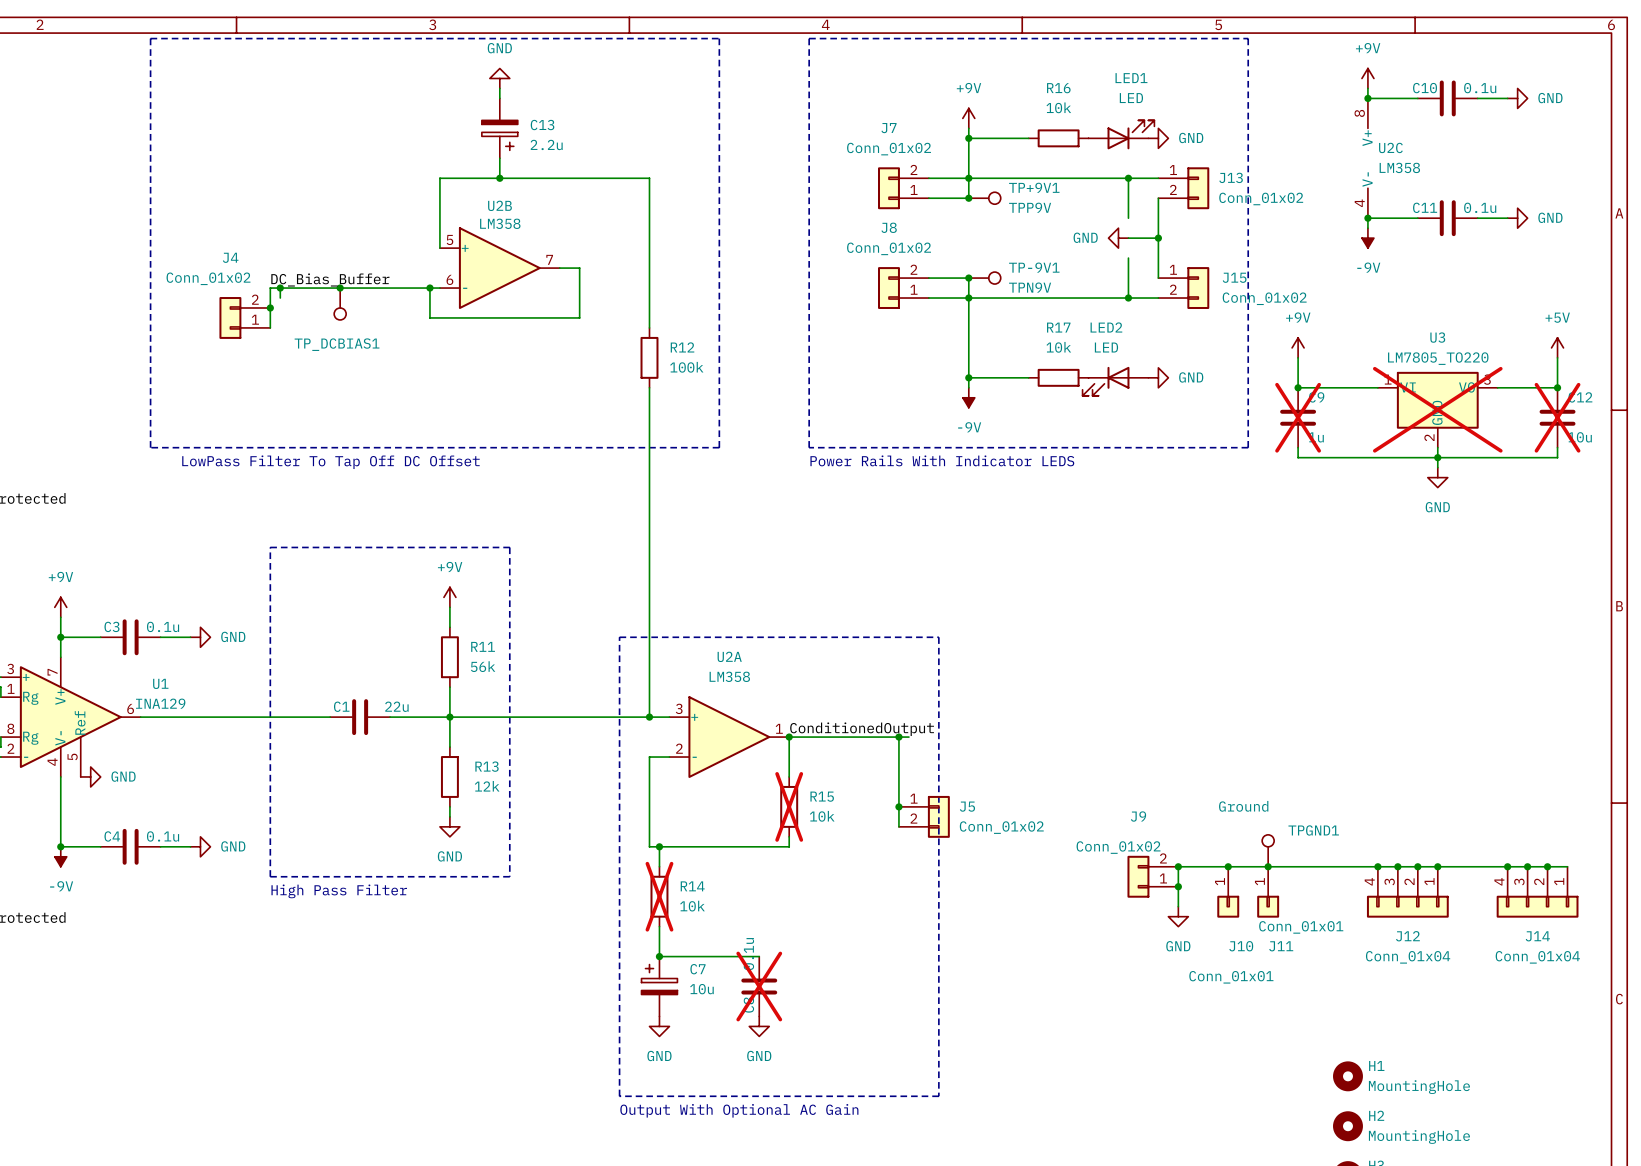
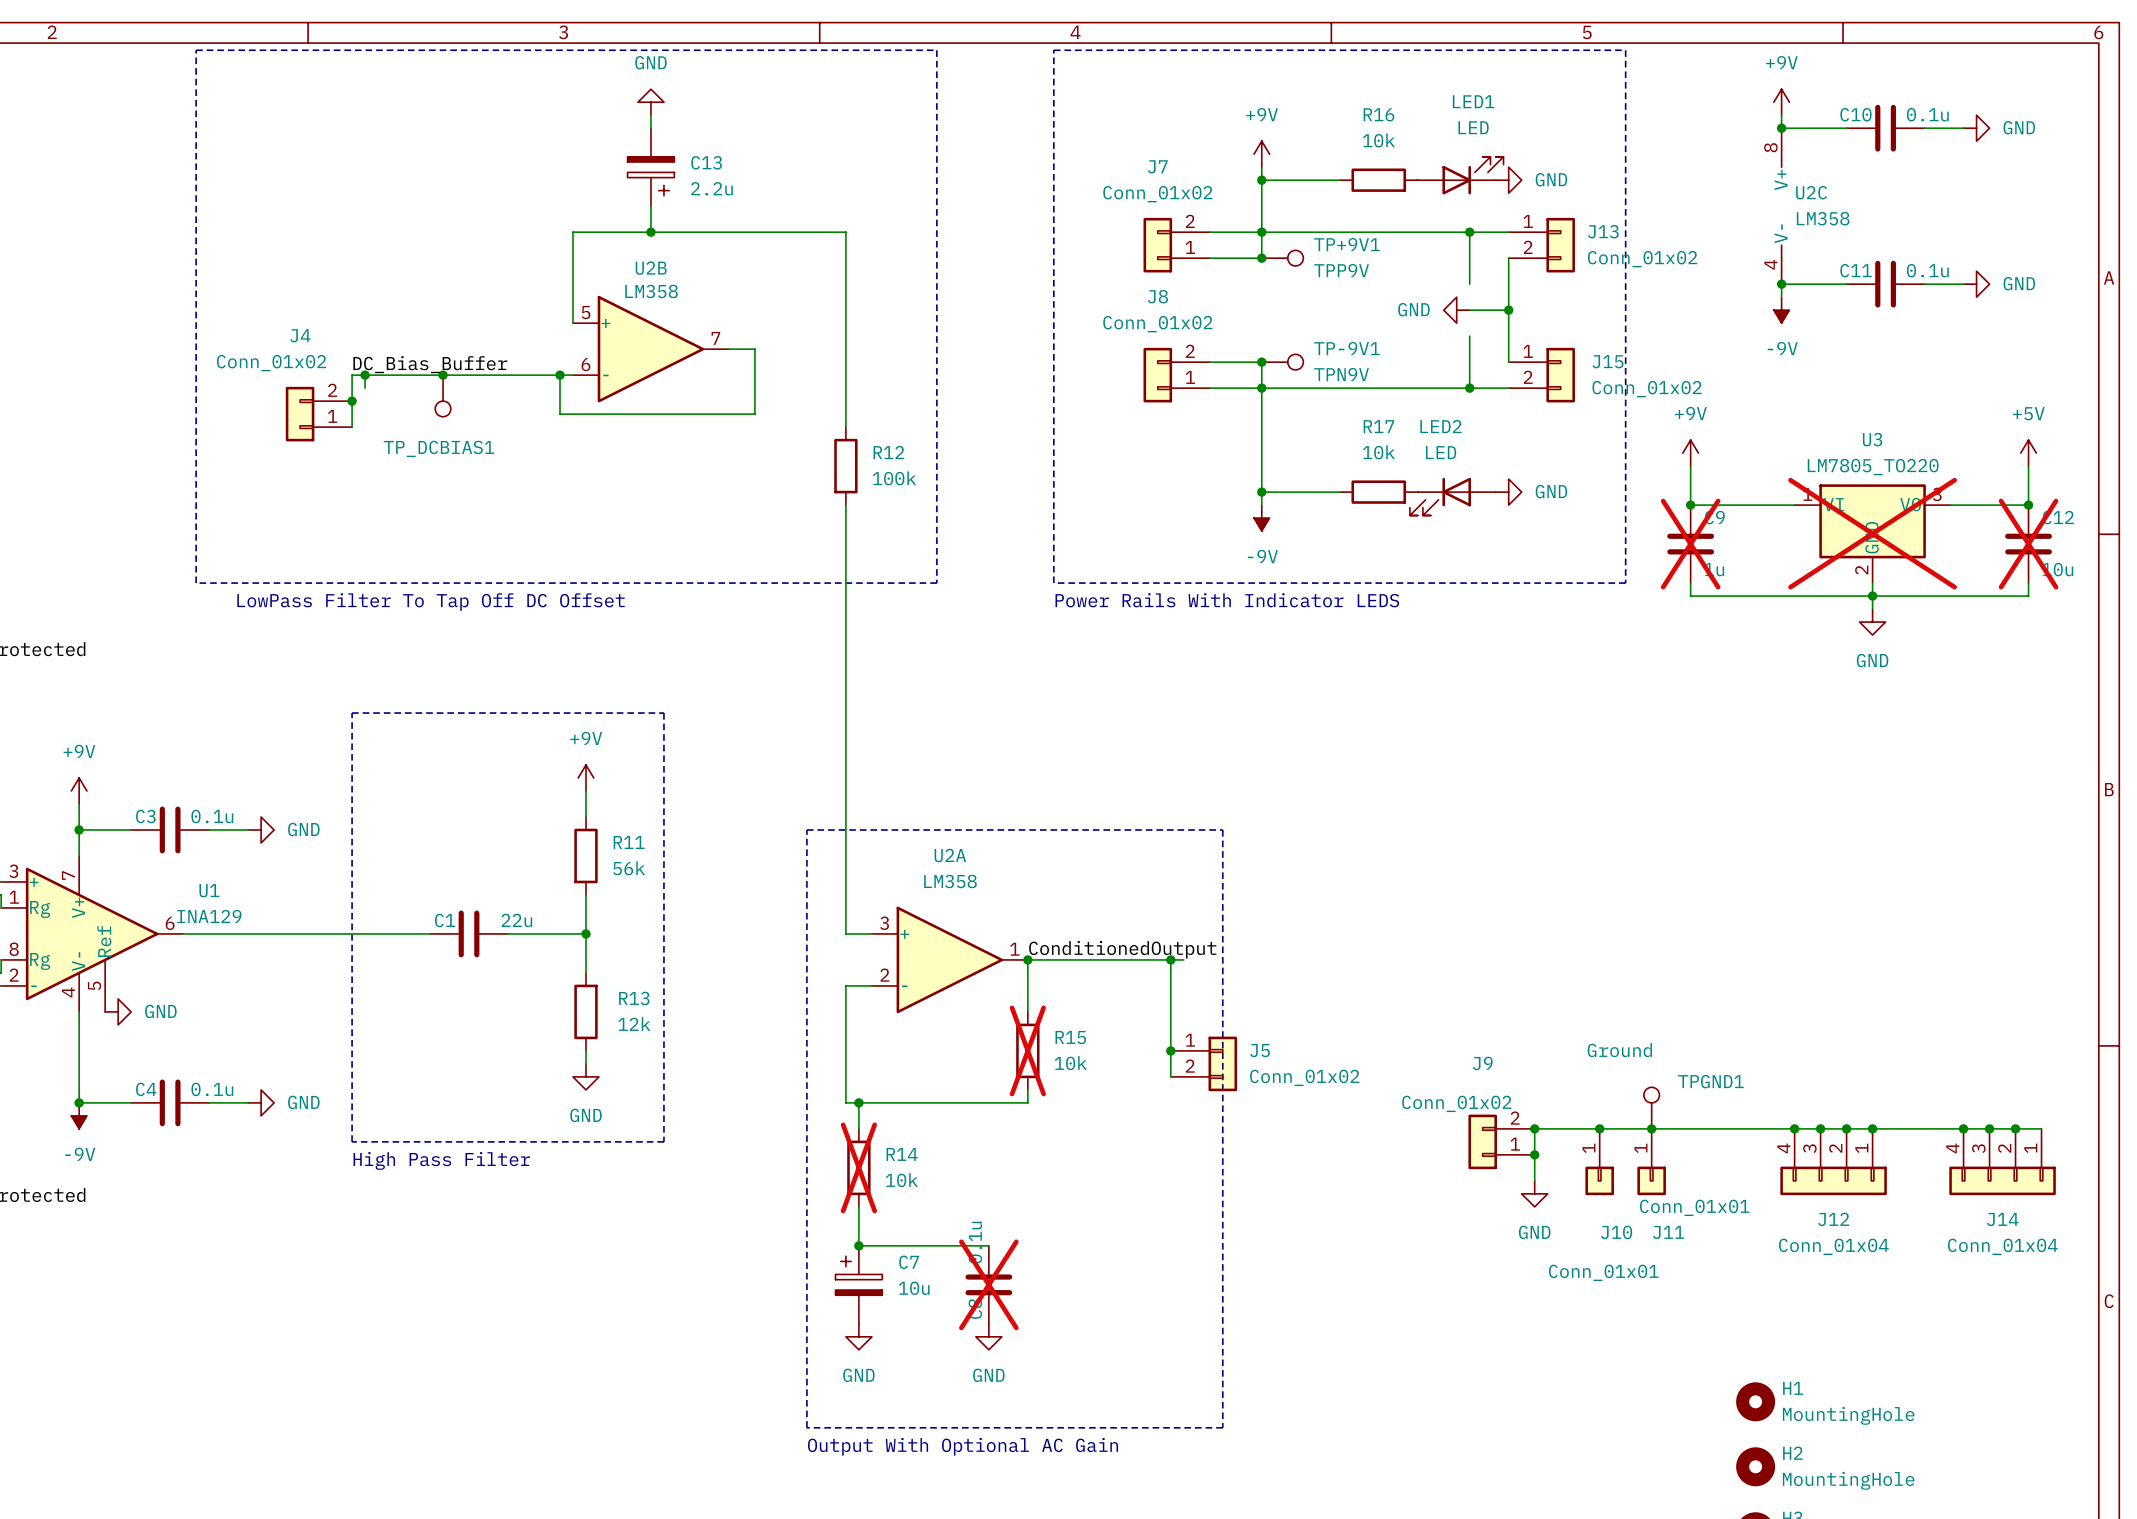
wire: (449, 717) (649, 717) -> none
junction: (649, 717) -> none

